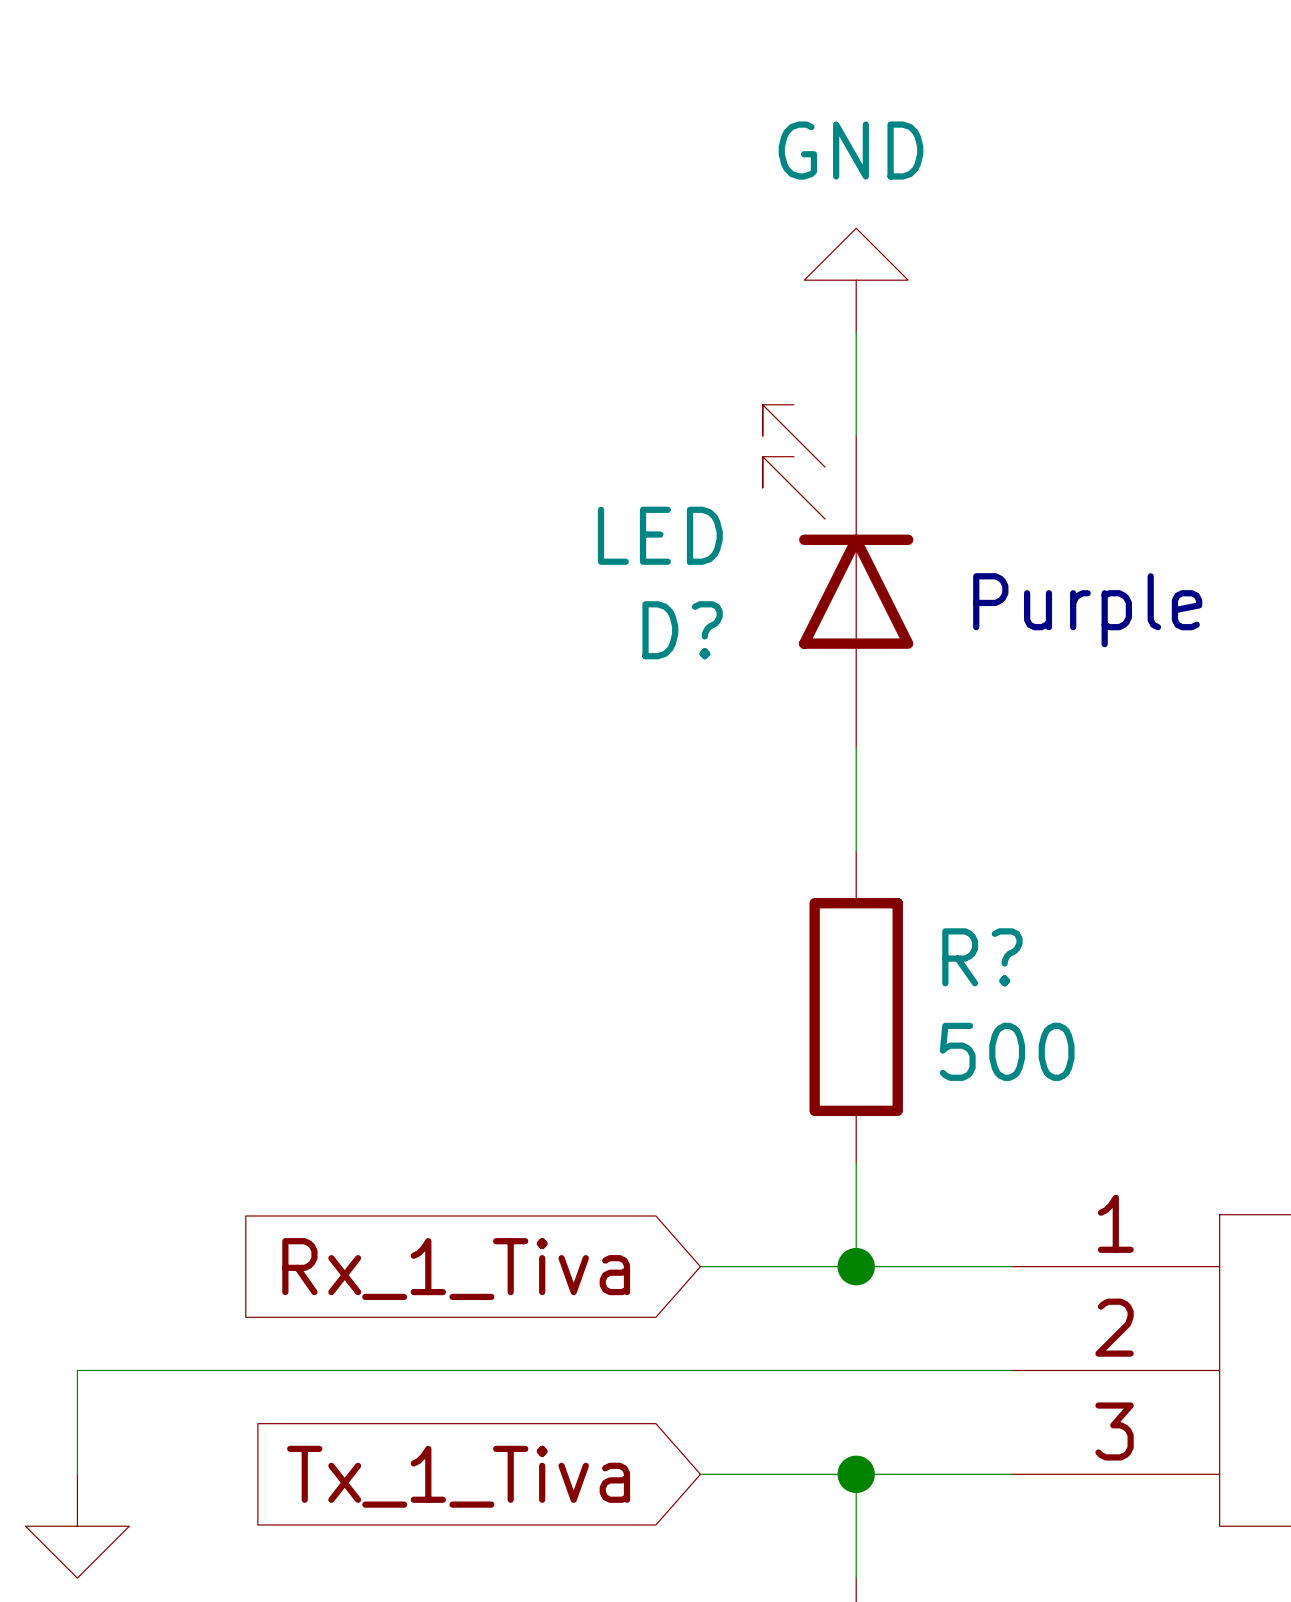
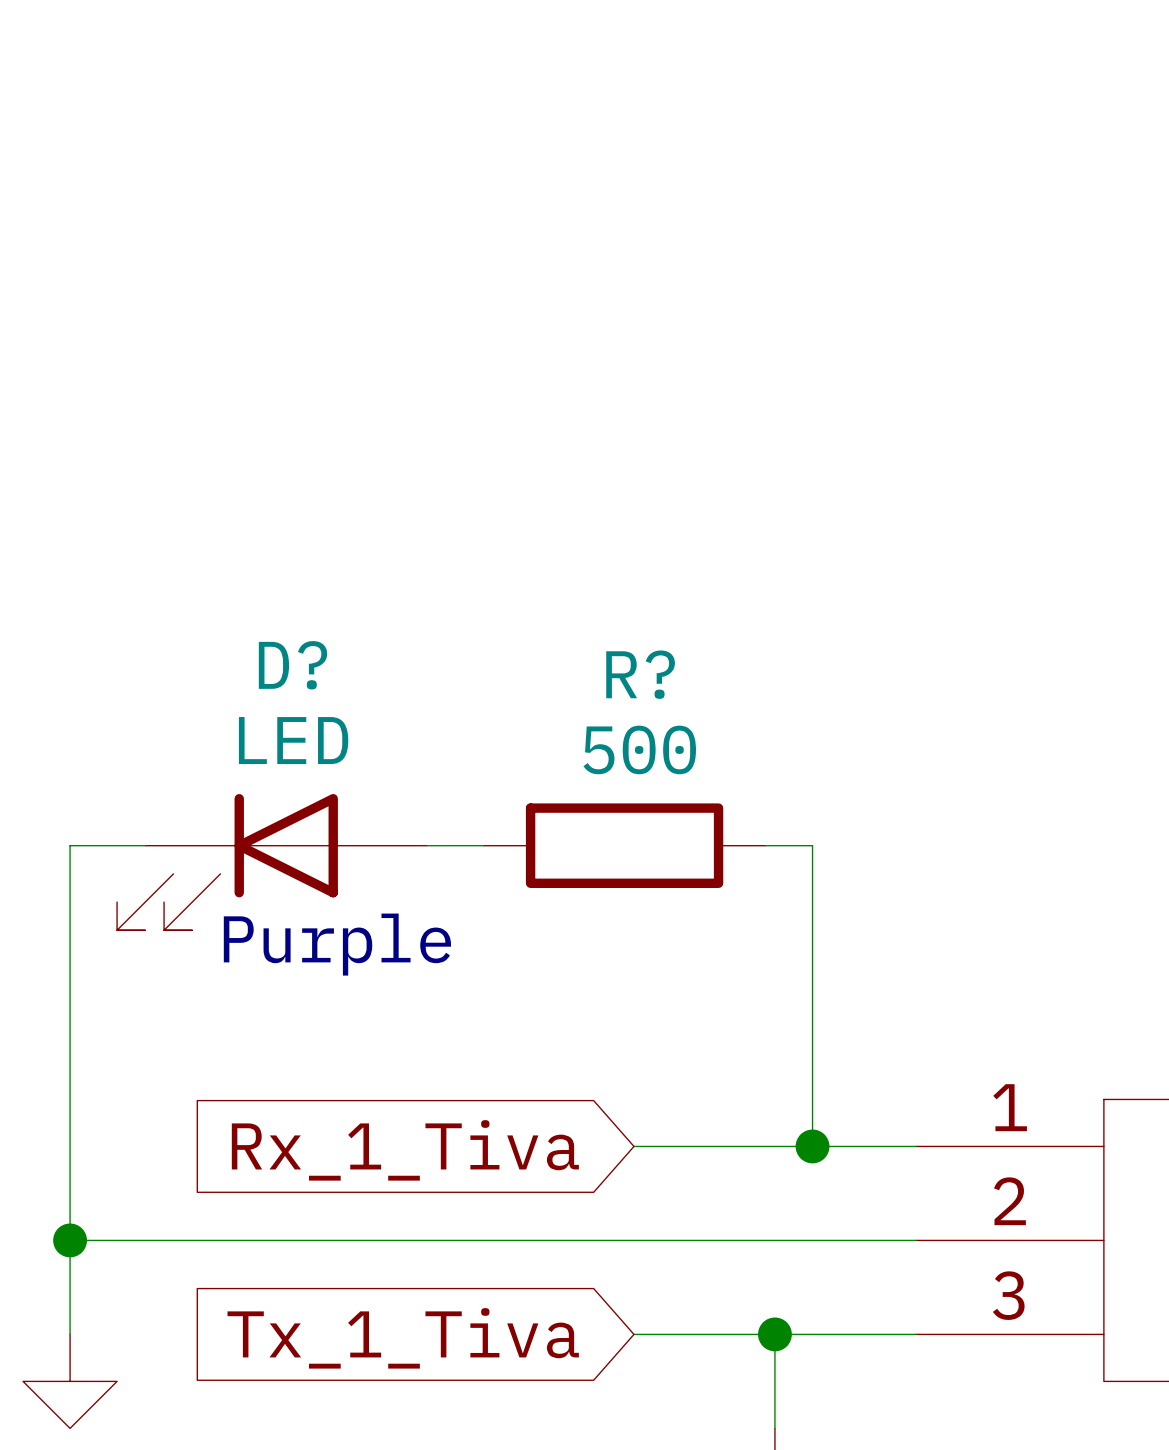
power symbol: GND (856, 280) -> none
wire: (856, 332) (856, 435) -> none
D? rotation: 0° (838, 526) -> 90° counterclockwise (227, 862)
D? value position: LED (660, 535) -> LED (293, 740)
D? position: (838, 576) -> (272, 862)
text position: Purple (1087, 610) -> Purple (337, 944)
D? name position: D? (682, 630) -> D? (293, 665)
wire: (856, 747) (856, 851) -> none
wire: none -> (145, 845) (70, 845) (70, 1240)
wire: none -> (427, 845) (483, 845)
wire: none -> (765, 845) (812, 845) (812, 1146)
R? name position: R? (982, 957) -> R? (640, 674)
R? rotation: 0° (856, 1007) -> 90° clockwise (624, 845)
R? value position: 500 (1007, 1051) -> 500 (639, 749)
wire: (856, 1162) (856, 1266) -> none
junction position: (856, 1266) -> (812, 1146)
junction: none -> (70, 1240)

